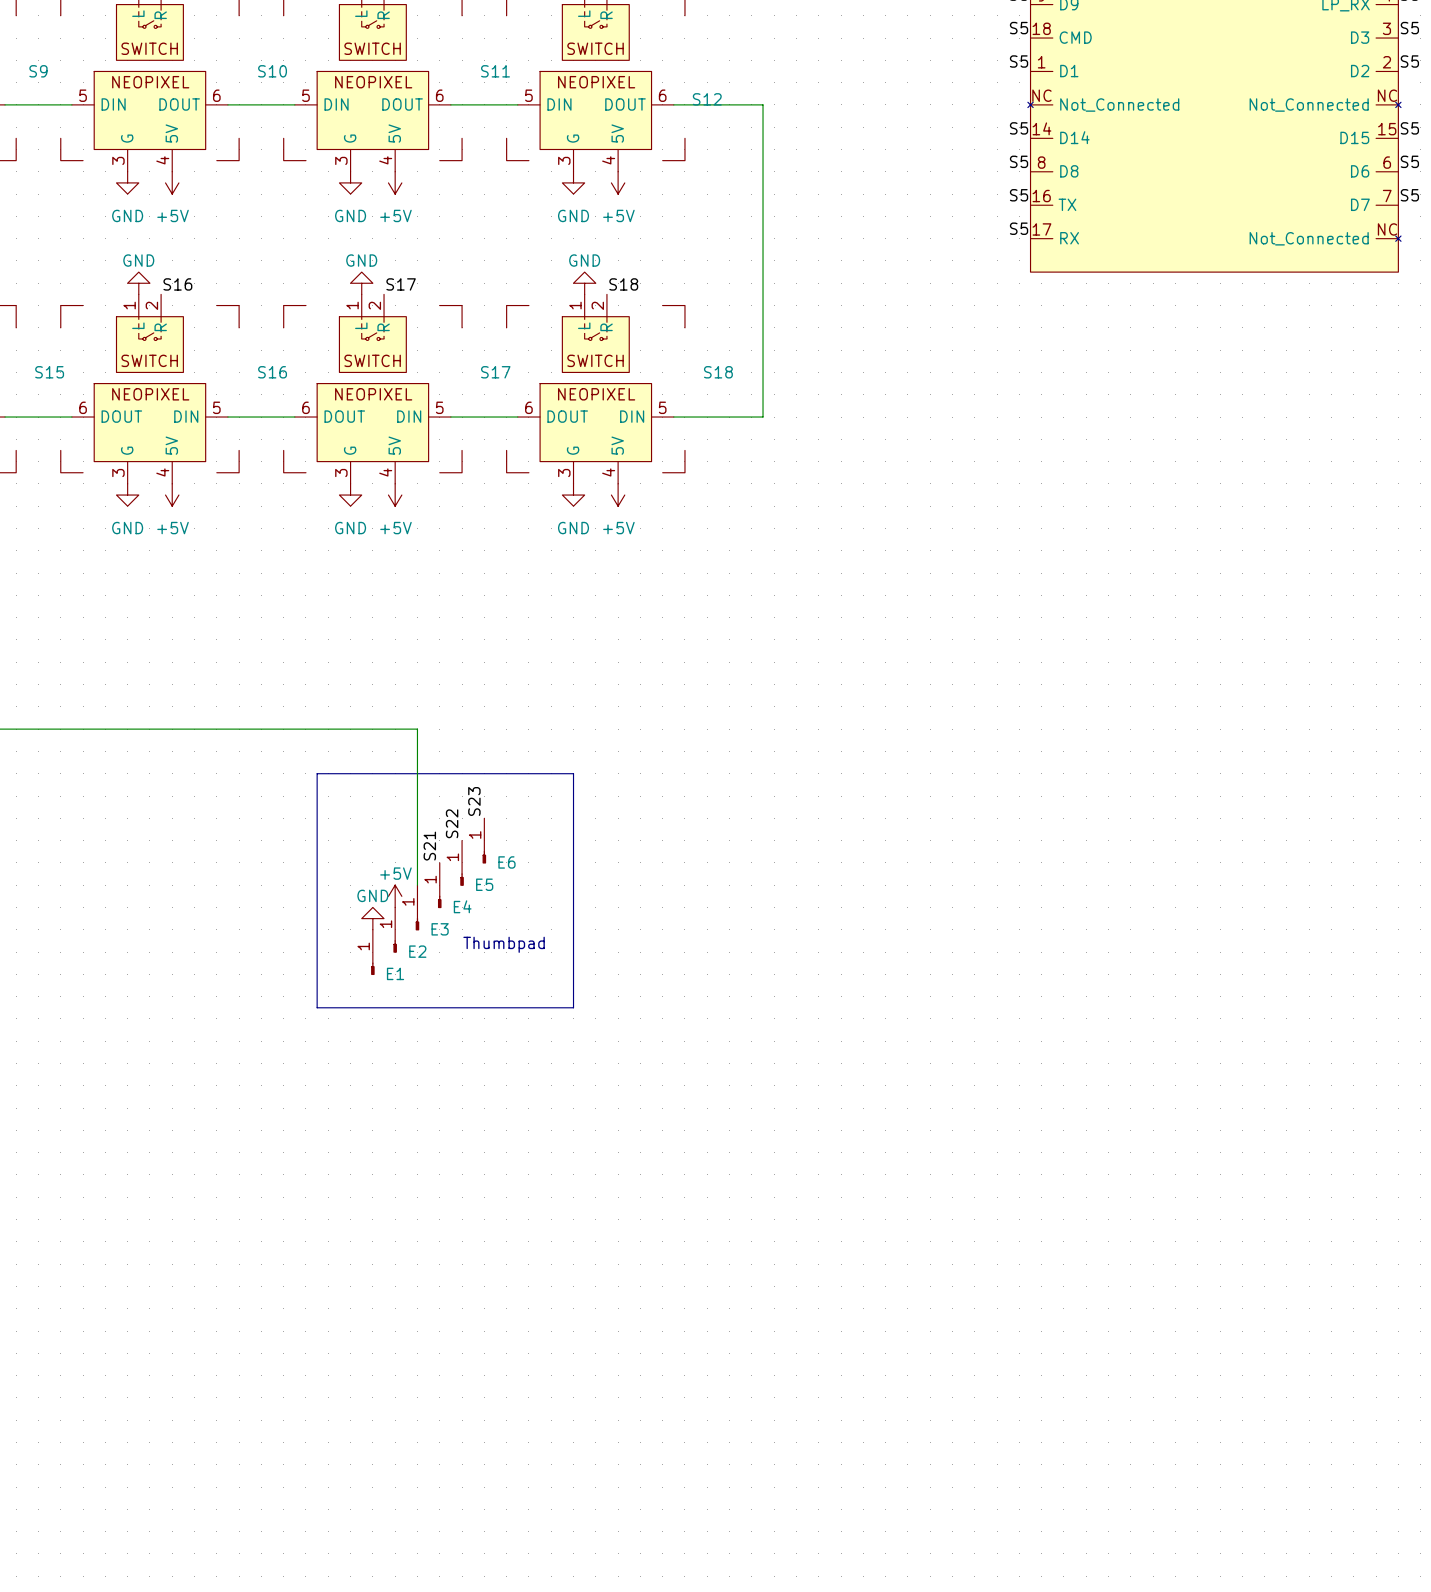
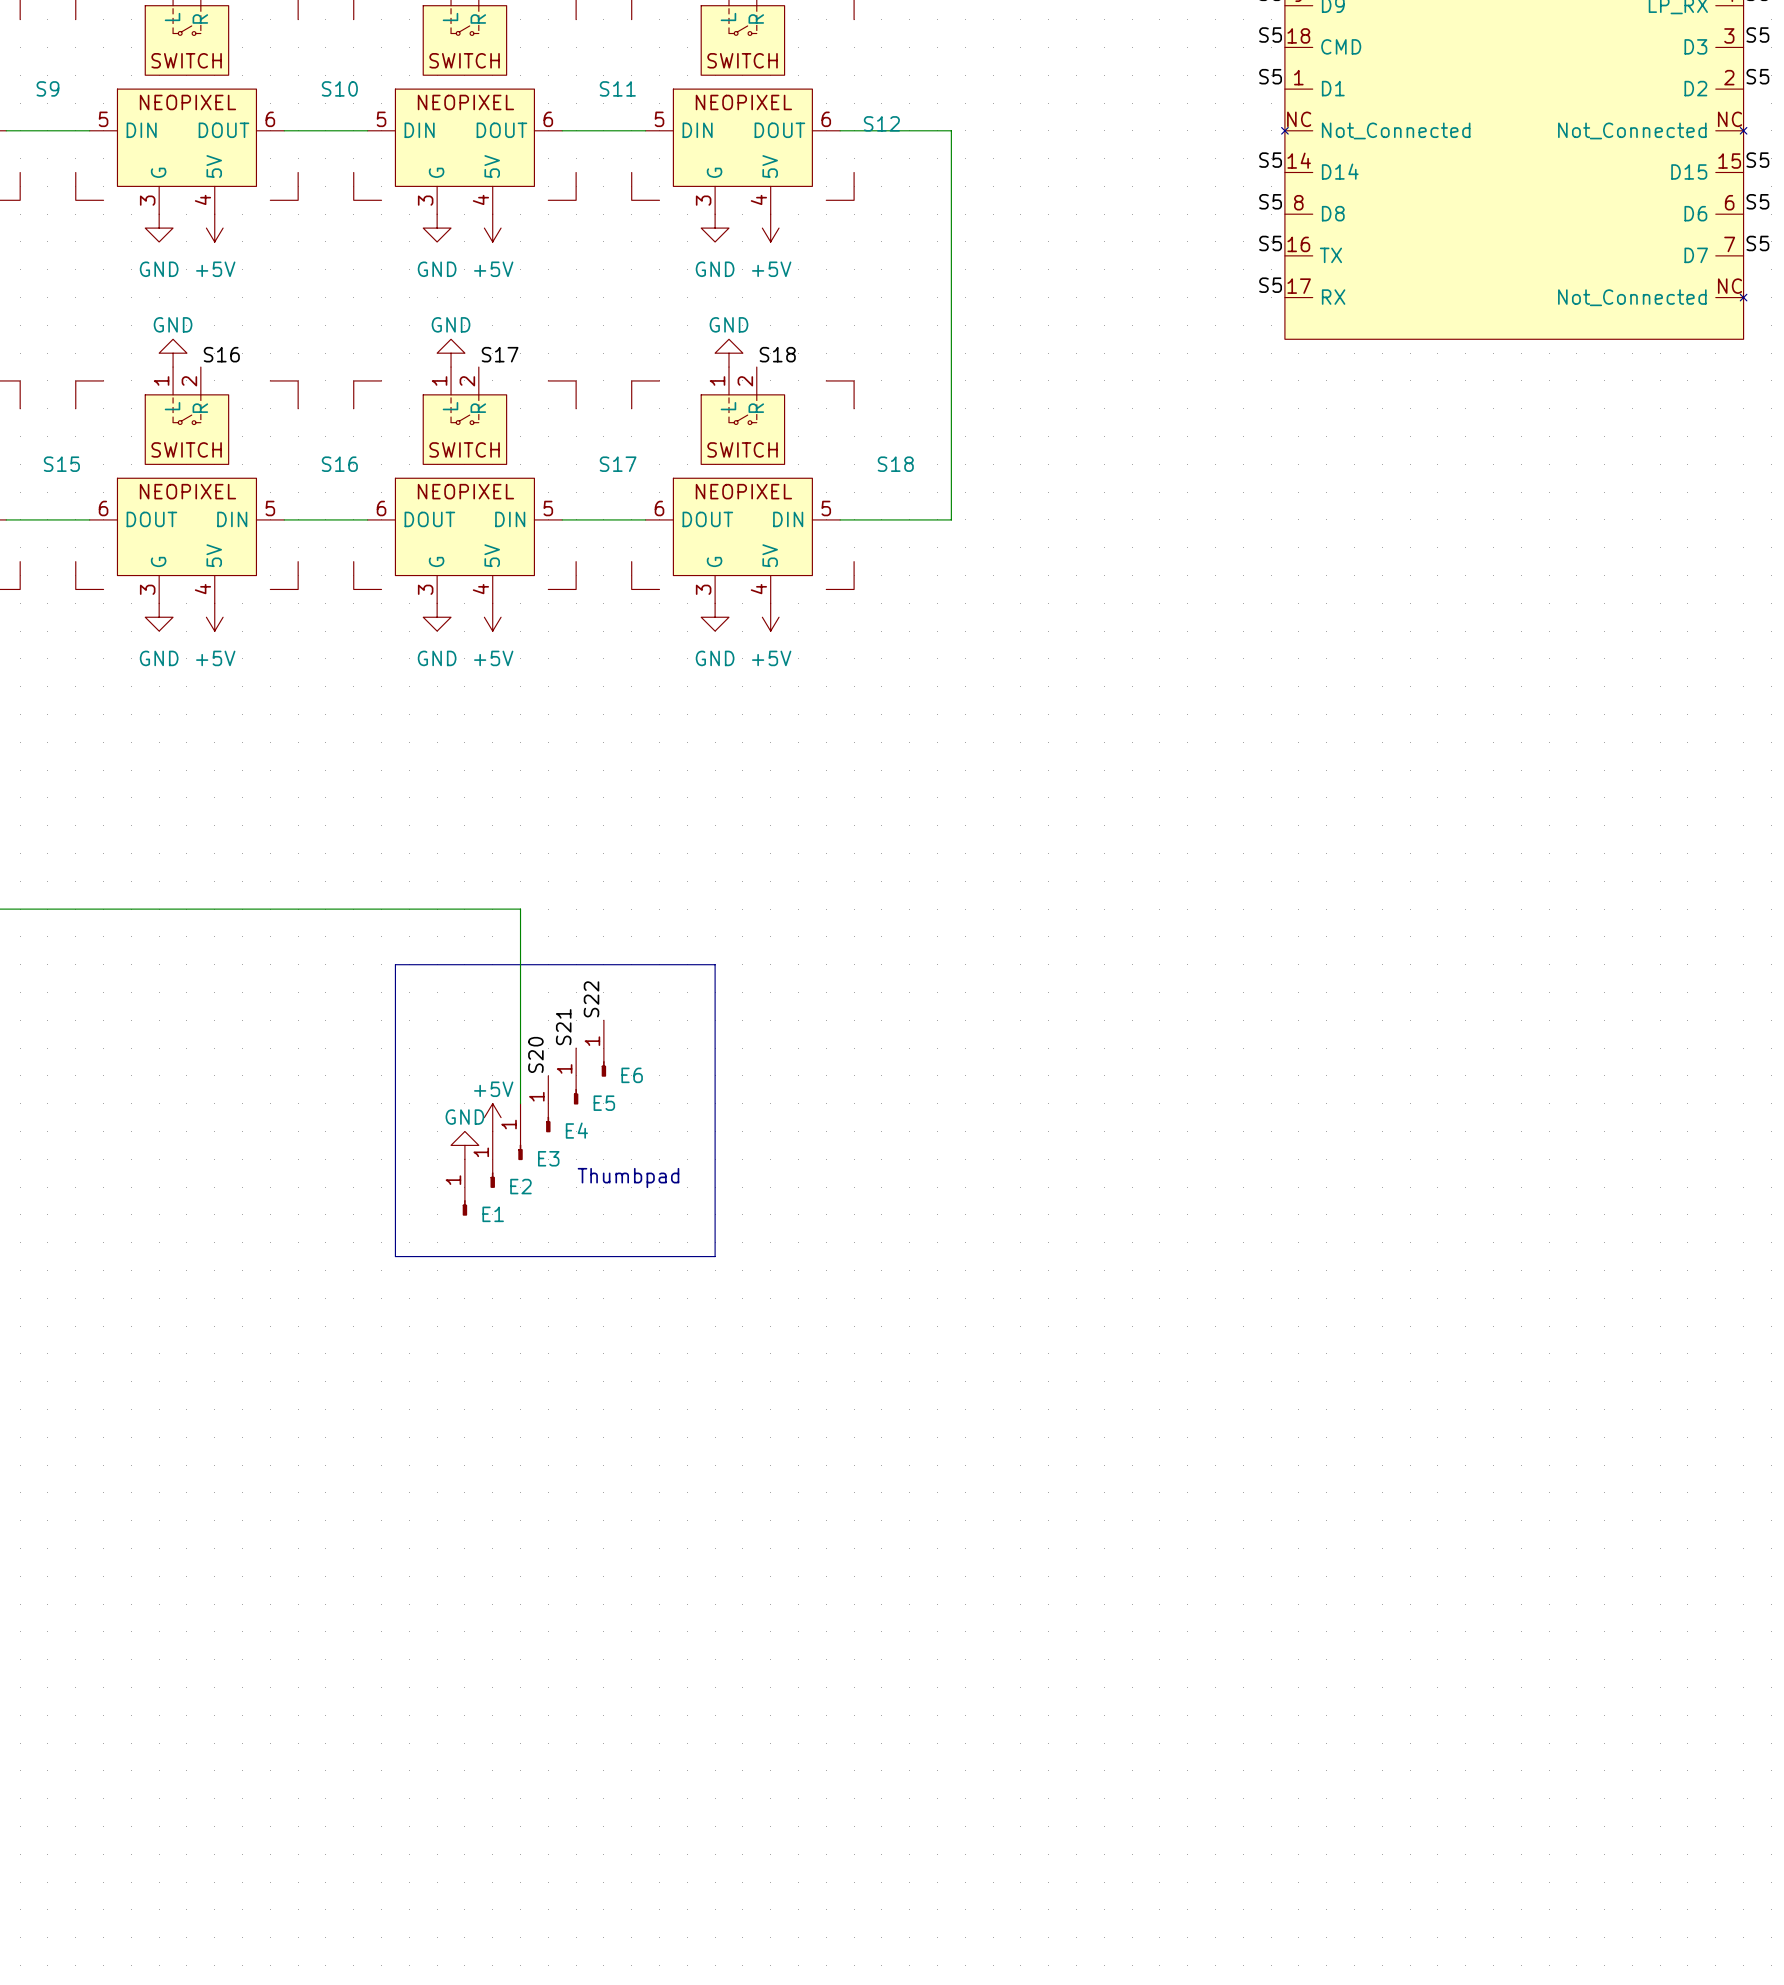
label: S23 (474, 801) -> S22 (591, 999)
label: S22 (452, 823) -> S21 (563, 1027)
label: S21 (429, 846) -> S20 (535, 1054)

